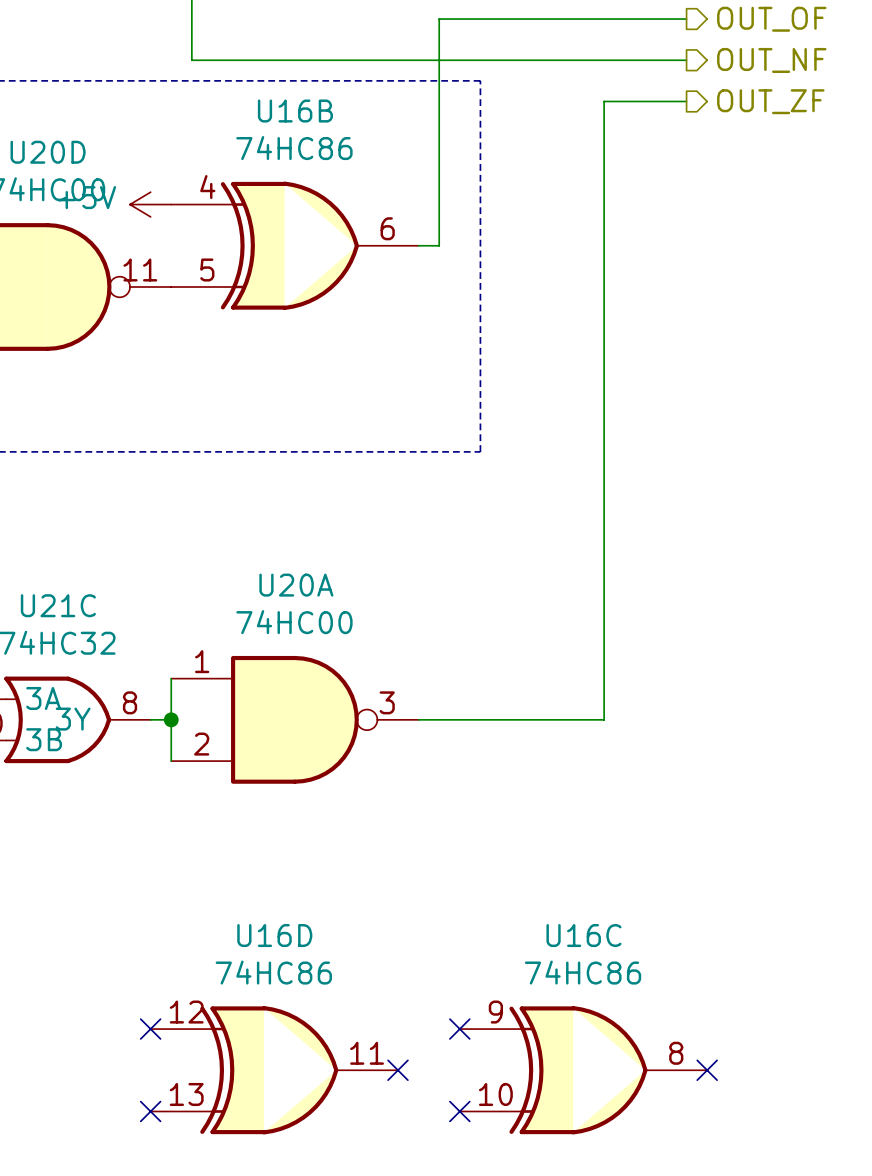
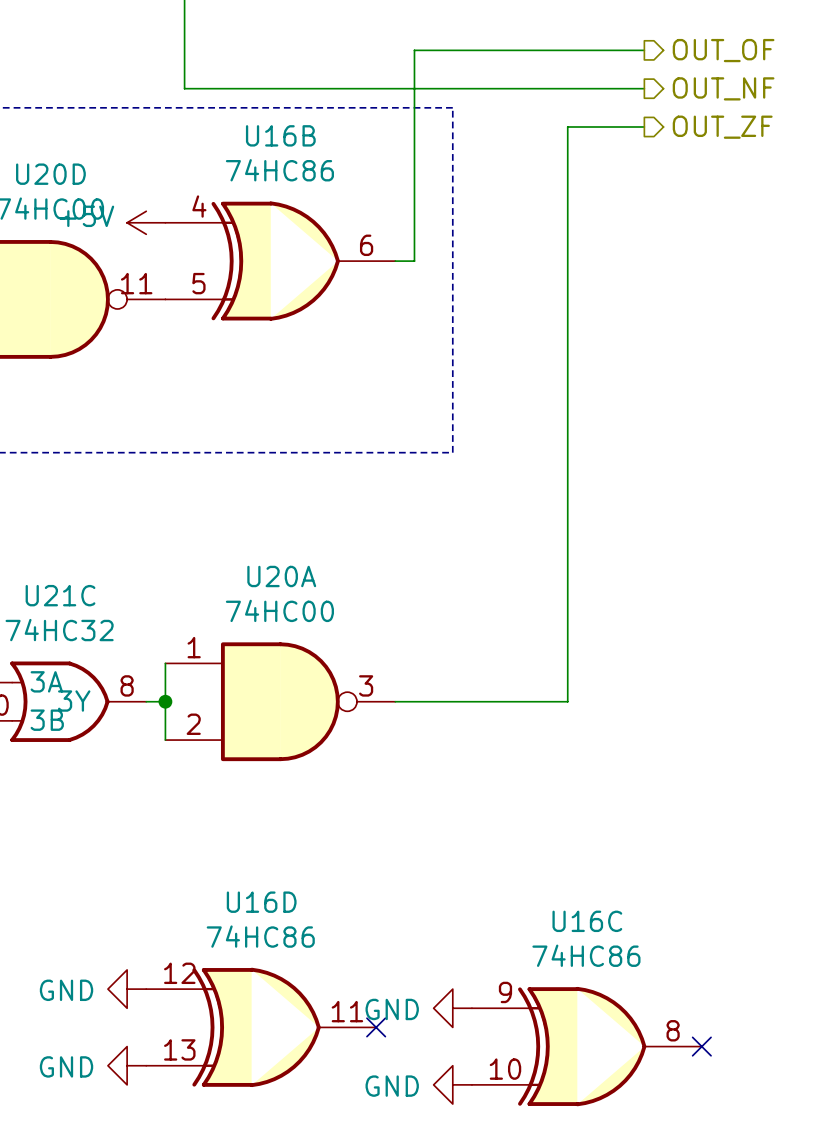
power symbol: none -> GND (127, 989)
no-connect mark: (150, 1029) -> none
no-connect mark: (459, 1029) -> none
power symbol: none -> GND (452, 1008)
U16C position: (583, 1070) -> (586, 1046)
no-connect mark position: (707, 1070) -> (701, 1046)
power symbol: none -> GND (127, 1065)
no-connect mark: (150, 1111) -> none
no-connect mark: (459, 1111) -> none
power symbol: none -> GND (452, 1084)

